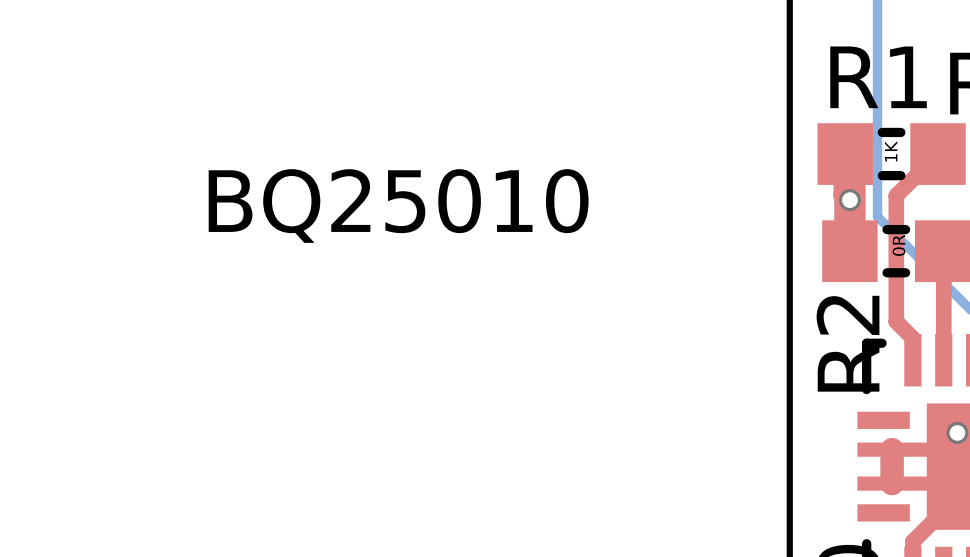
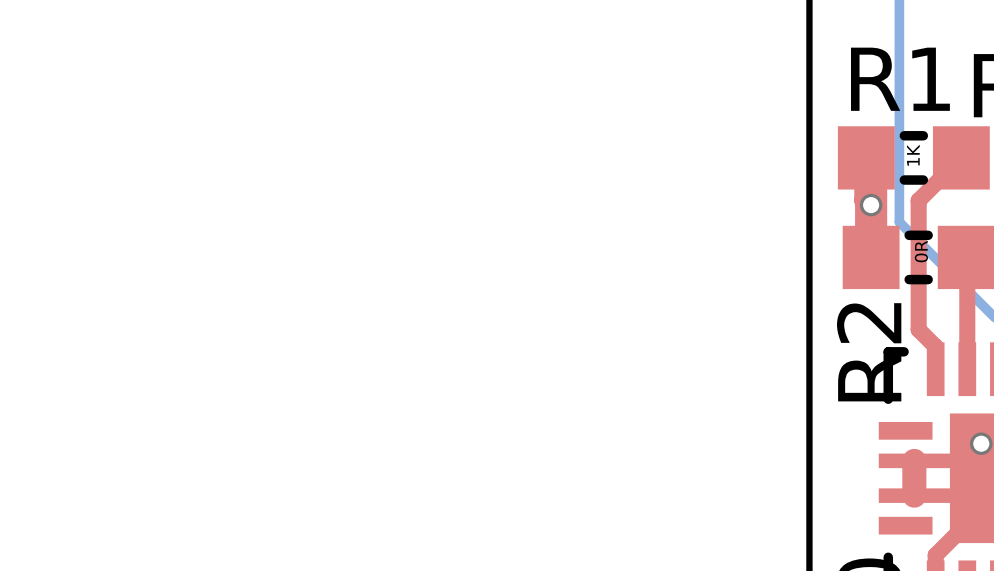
part value: BQ25010 (398, 206) -> none

